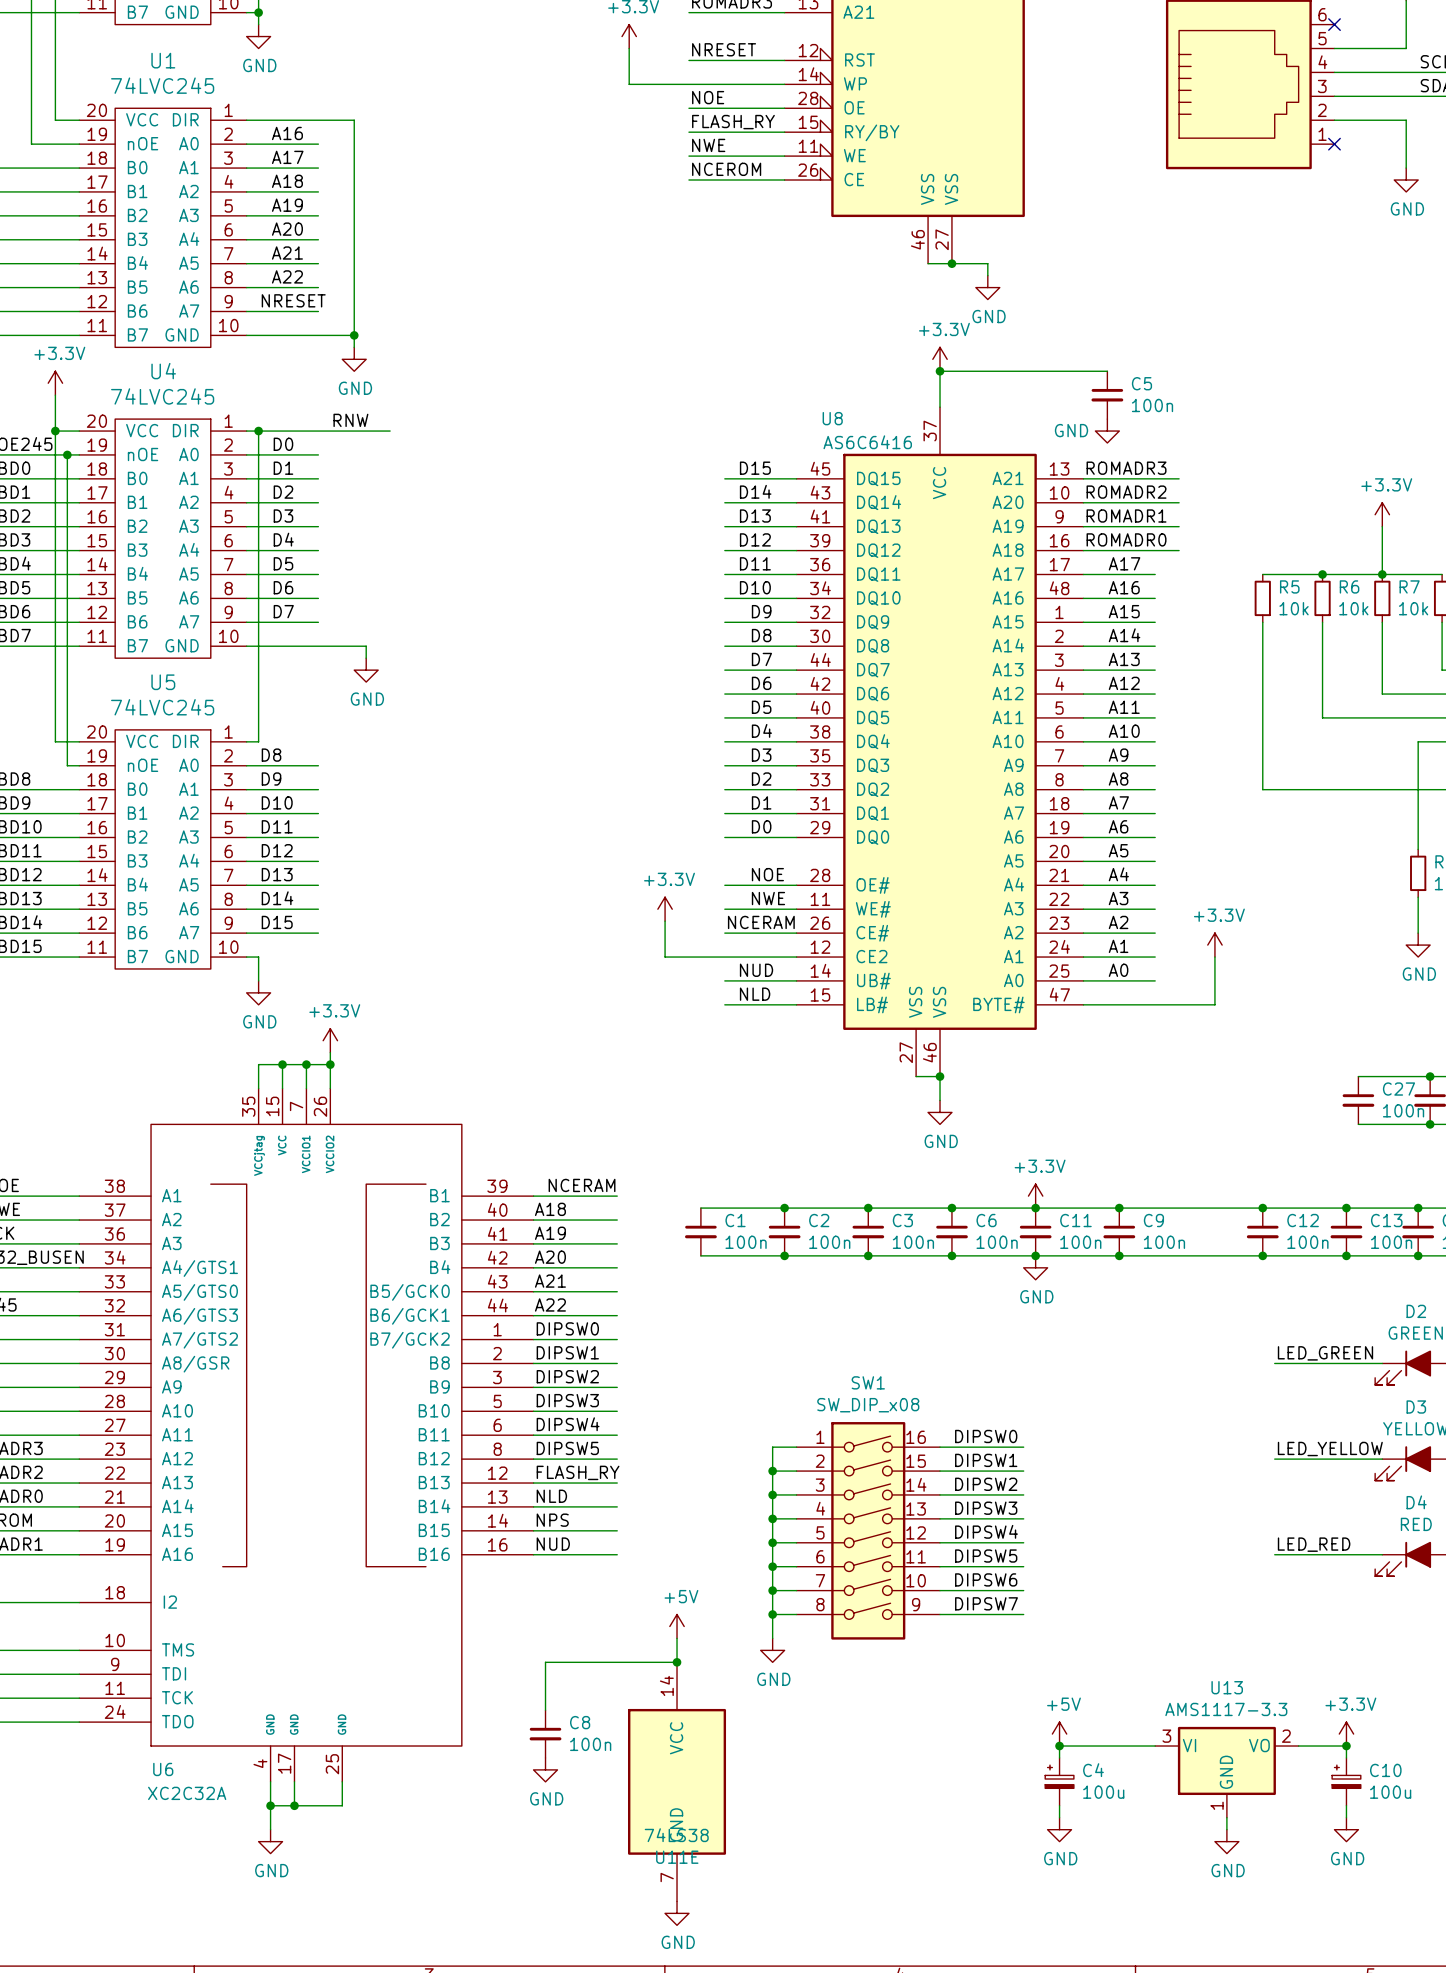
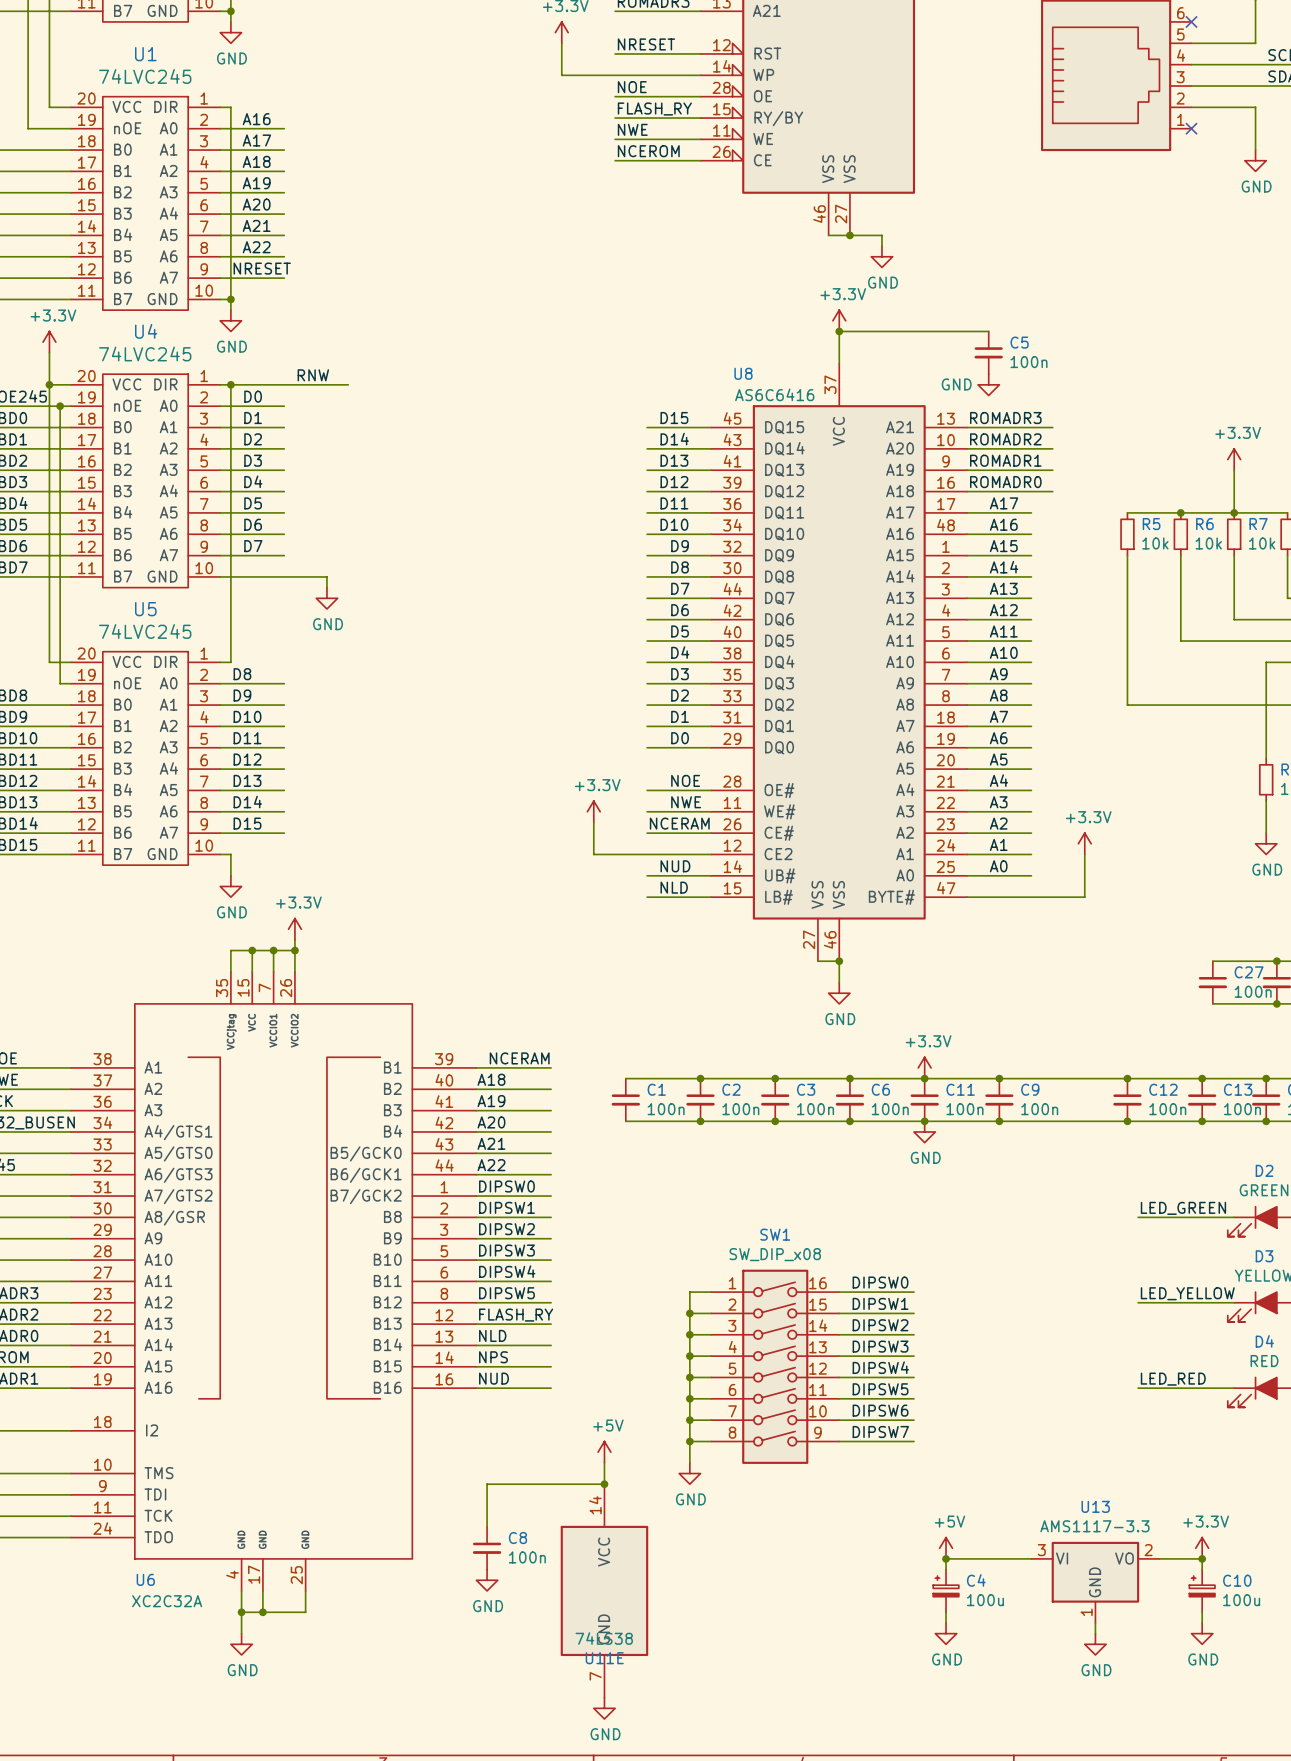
wire: (258, 120) (354, 120) (354, 347) -> (230, 107) (230, 310)
wire: (258, 335) (354, 335) -> none
junction: none -> (230, 299)
junction: (354, 335) -> none
power symbol position: GND (354, 359) -> GND (230, 320)

